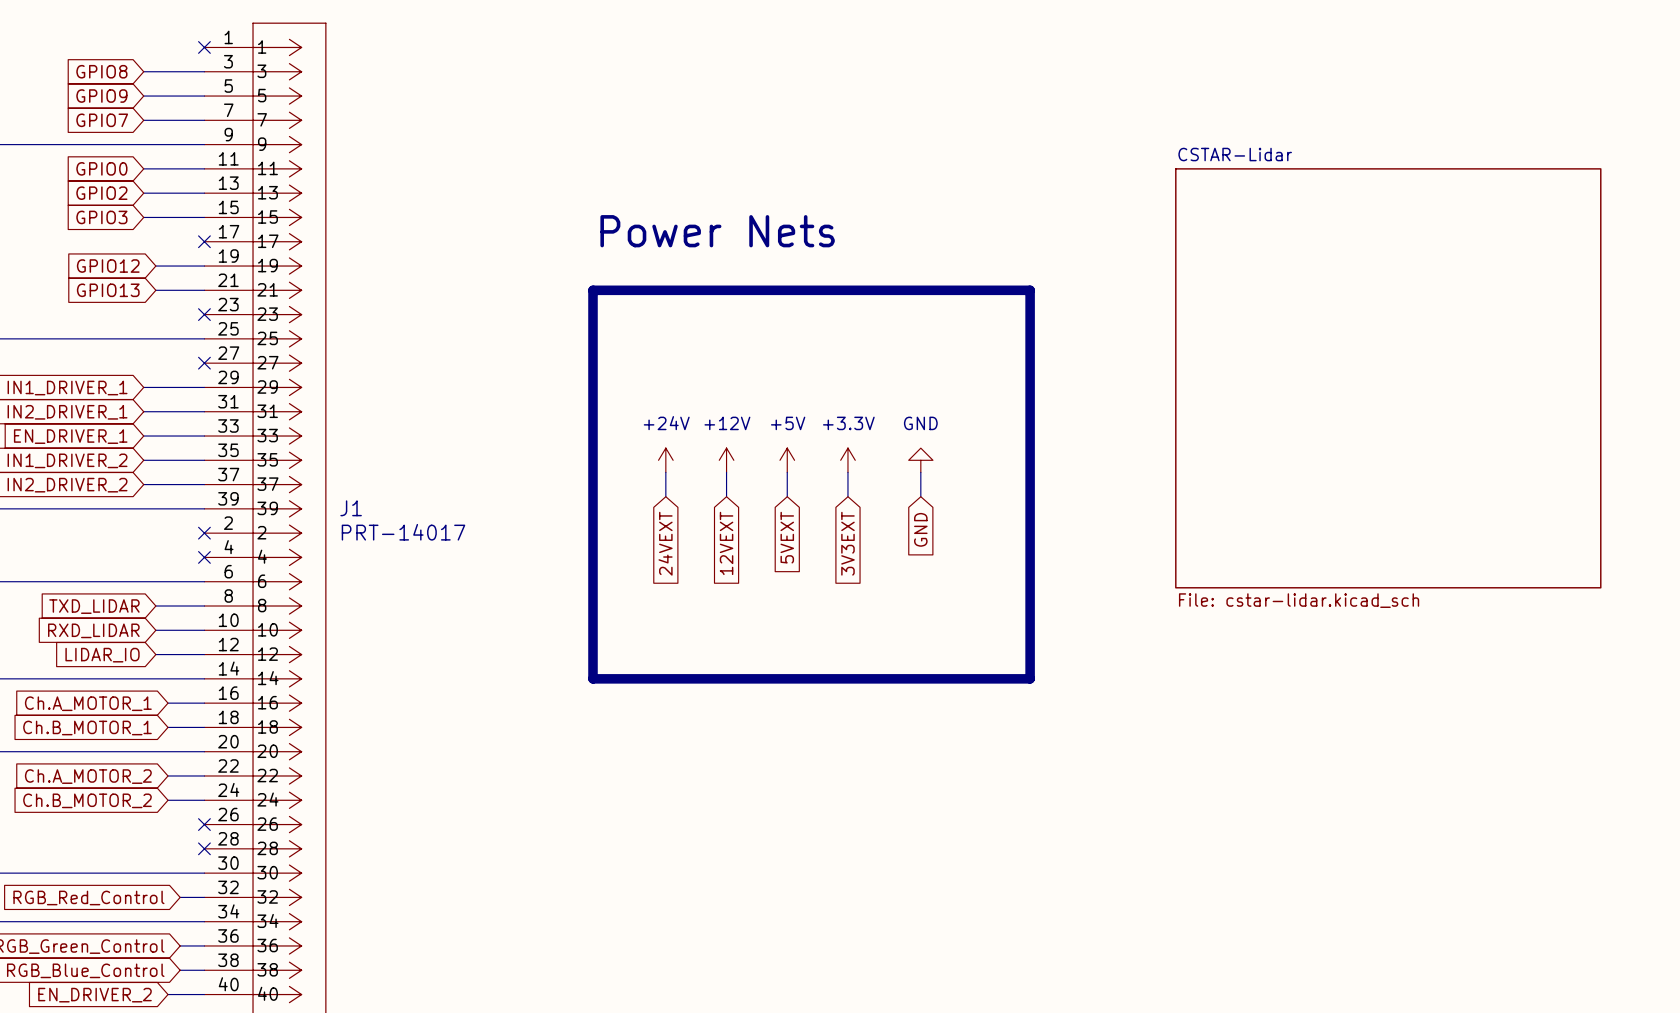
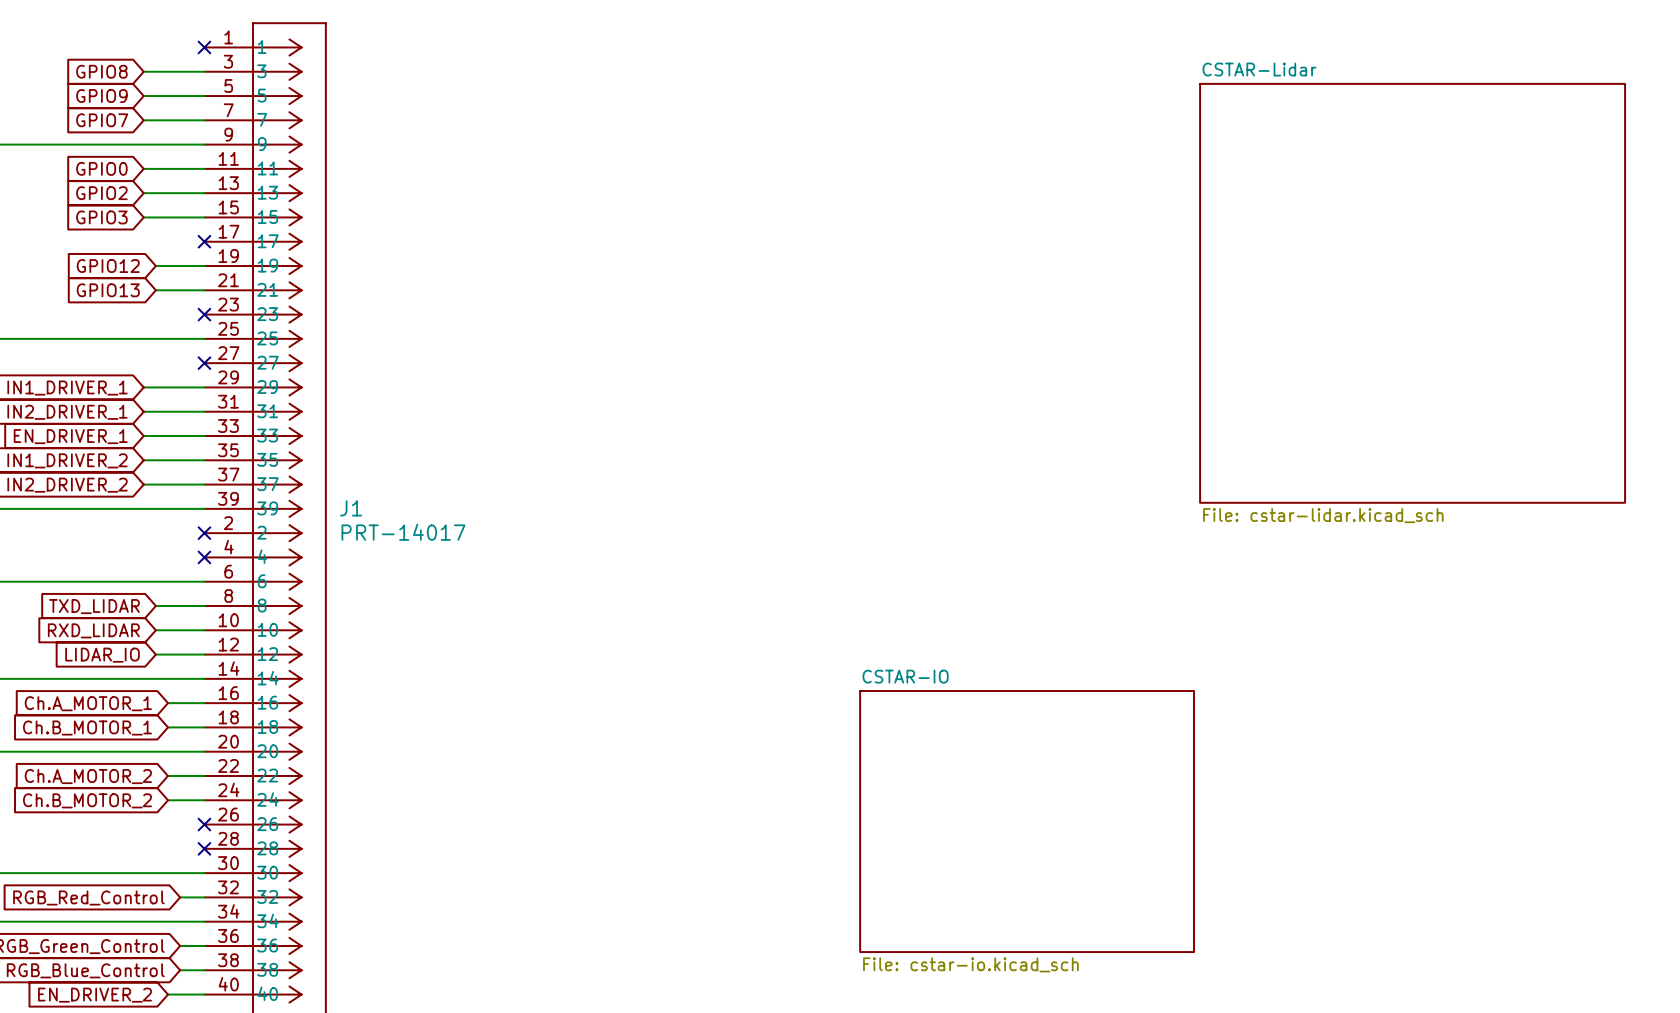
text: Power Nets (717, 231) -> none
line: (592, 290) (1030, 290) (1030, 678) (592, 678) (592, 290) -> none
sheet CSTAR-Lidar position: (1388, 378) -> (1412, 293)
power symbol: +24V (665, 460) -> none
power symbol: +12V (726, 460) -> none
power symbol: +5V (787, 460) -> none
power symbol: +3.3V (847, 460) -> none
power symbol: GND (920, 460) -> none
wire: (665, 472) (665, 496) -> none
wire: (726, 472) (726, 496) -> none
wire: (787, 472) (787, 496) -> none
wire: (847, 472) (847, 496) -> none
wire: (920, 472) (920, 496) -> none
global label: GND (920, 529) -> none
global label: 5VEXT (787, 537) -> none
global label: 24VEXT (665, 543) -> none
global label: 12VEXT (726, 543) -> none
global label: 3V3EXT (847, 543) -> none
sheet CSTAR-IO: none -> File: cstar-io.kicad_sch (1027, 821)

